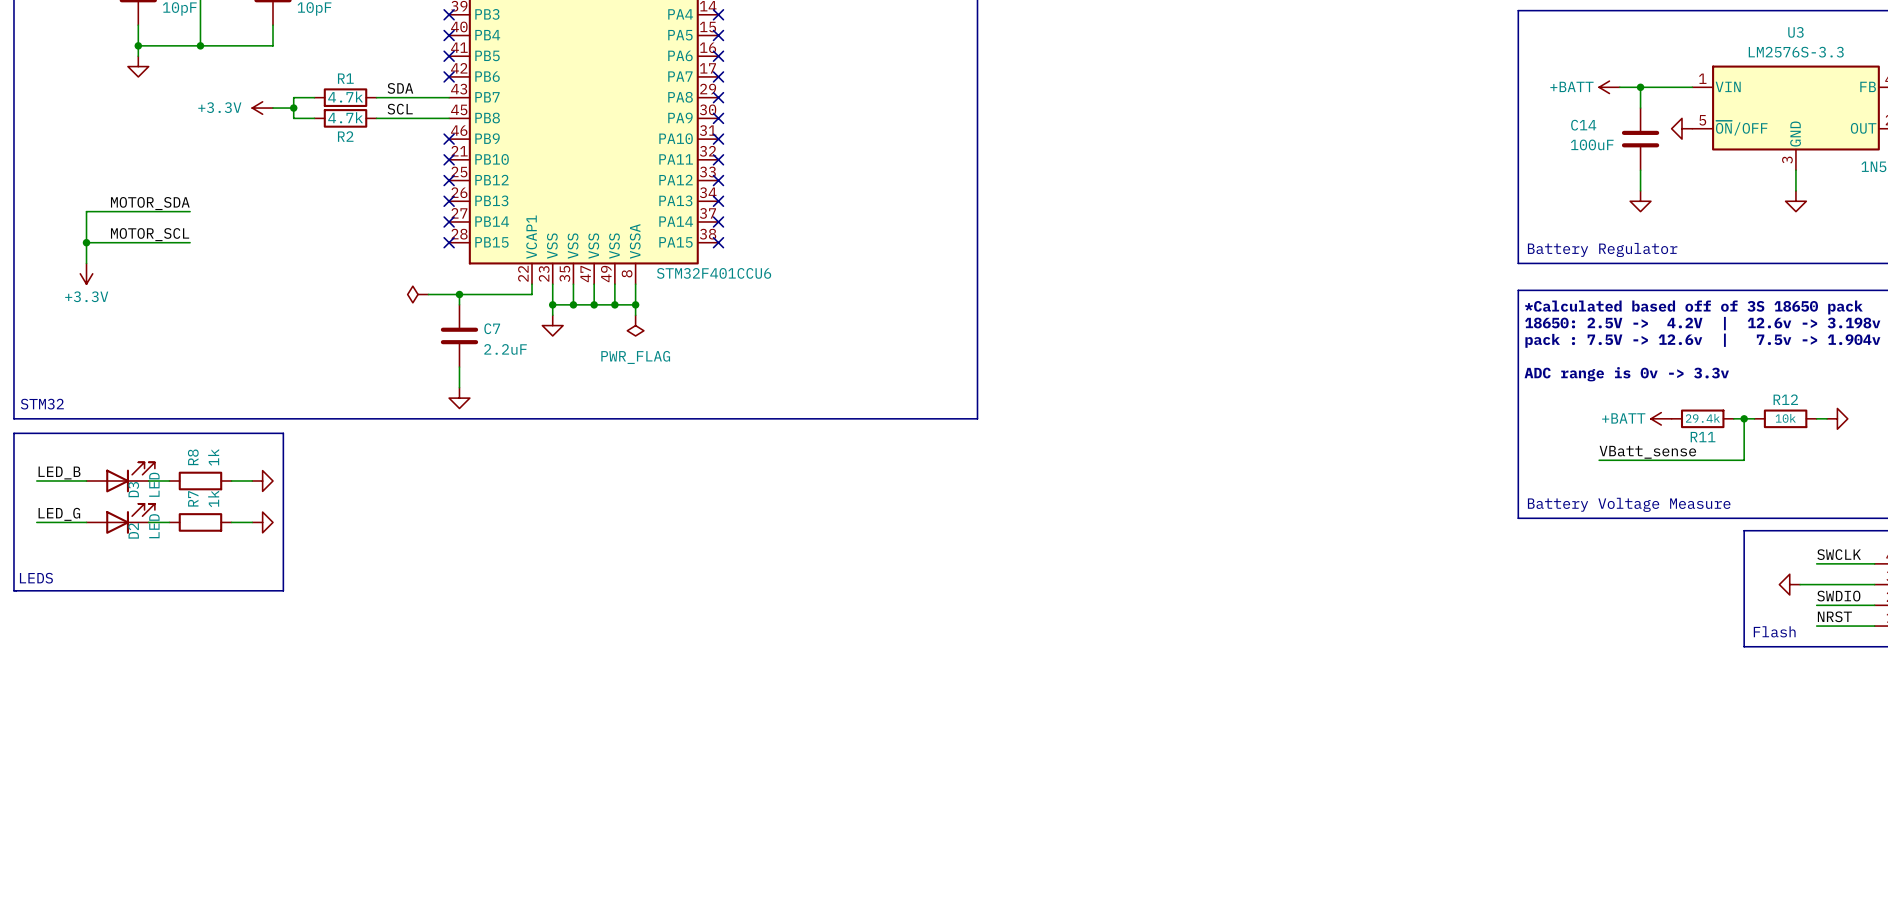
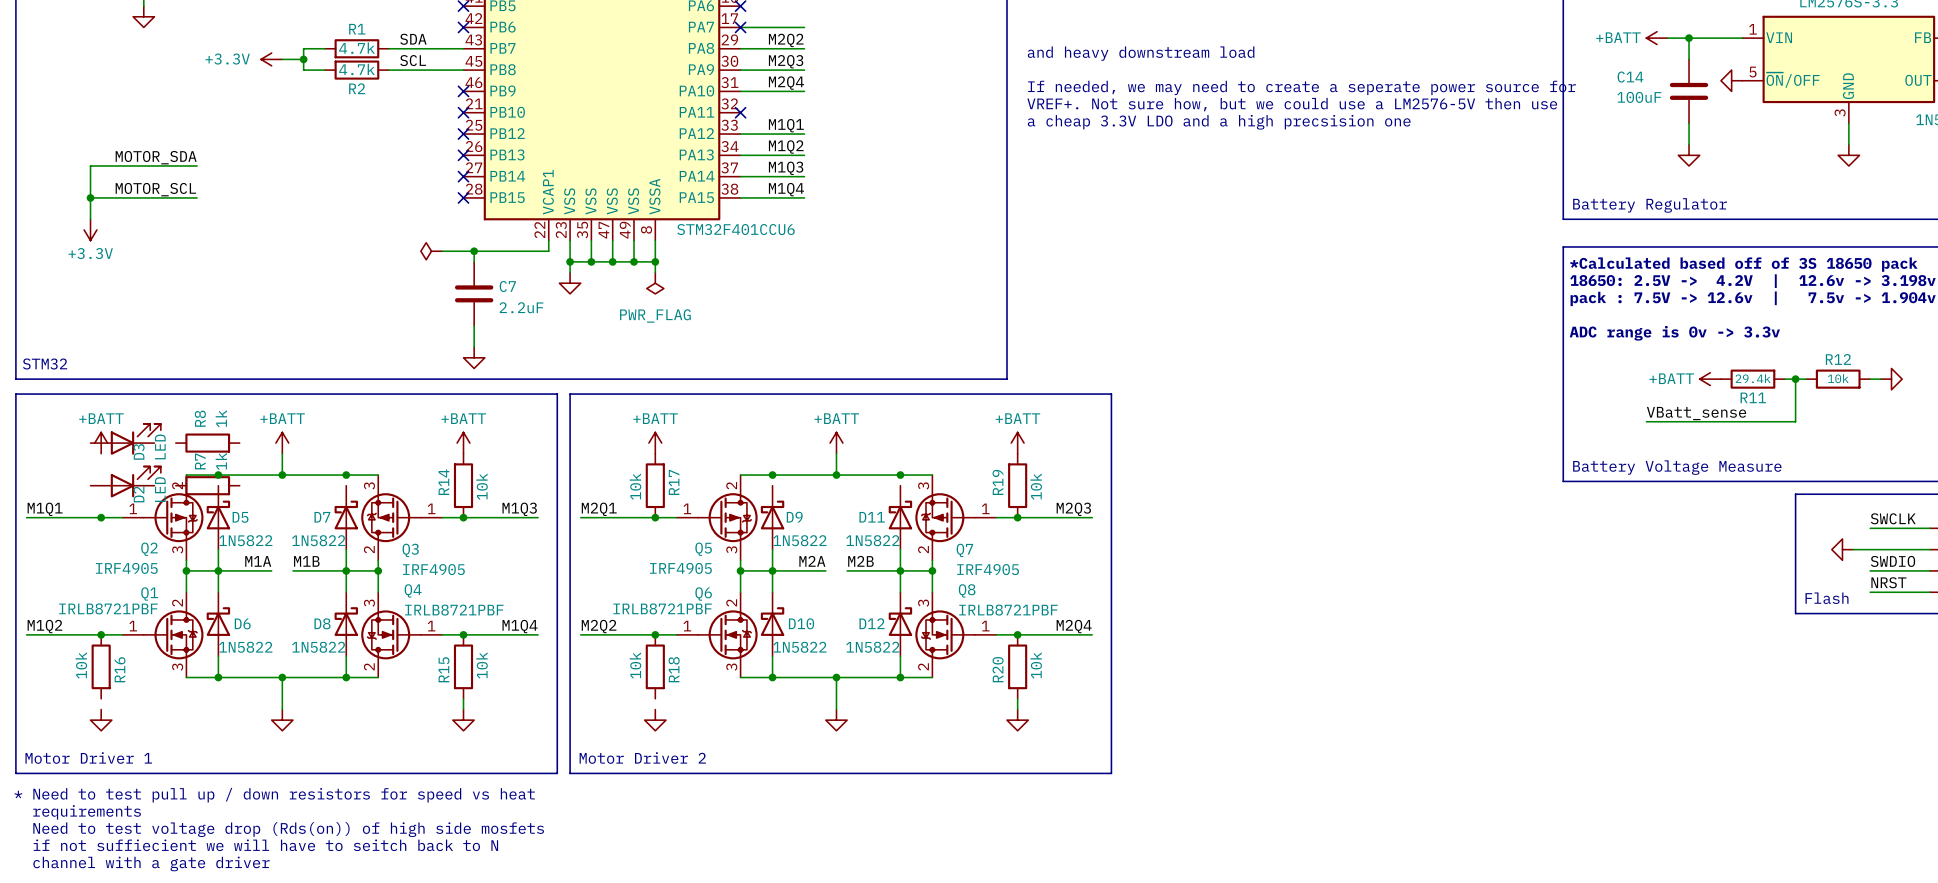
wire: none -> (740, 27) (804, 27)
label: none -> M2Q2 (786, 40)
wire: none -> (740, 48) (804, 48)
no-connect mark: (718, 97) -> none
text: none -> and heavy downstream load (1141, 53)
label: none -> M2Q3 (786, 61)
wire: none -> (740, 70) (804, 70)
no-connect mark: (718, 118) -> none
label: none -> M2Q4 (786, 83)
text: none -> If needed, we may need to create a seperate power source for (1301, 87)
wire: none -> (740, 91) (804, 91)
no-connect mark: (718, 139) -> none
text: none -> VREF+. Not sure how, but we could use a LM2576-5V then use (1292, 104)
text: none -> a cheap 3.3V LDO and a high precsision one (1219, 122)
label: none -> M1Q1 (786, 125)
wire: none -> (740, 134) (804, 134)
no-connect mark: (718, 180) -> none
label: none -> M1Q2 (786, 146)
wire: none -> (740, 155) (804, 155)
no-connect mark: (718, 201) -> none
label: none -> M1Q3 (786, 168)
wire: none -> (740, 176) (804, 176)
no-connect mark: (718, 221) -> none
label: none -> M1Q4 (786, 189)
wire: none -> (740, 197) (804, 197)
no-connect mark: (718, 242) -> none
line: (283, 433) (283, 590) (13, 590) -> (292, 394) (557, 394) (557, 773) (15, 773) (15, 556)
line: none -> (570, 394) (1111, 394) (1111, 773) (570, 773) (570, 394)
label: LED_B (59, 473) -> none
wire: (36, 480) (86, 480) -> none
power symbol: none -> +BATT (101, 443)
wire: (148, 480) (169, 480) -> none
wire: (231, 480) (252, 480) -> none
power symbol: (262, 480) -> none
power symbol: none -> +BATT (282, 443)
power symbol: none -> +BATT (463, 443)
power symbol: none -> +BATT (655, 443)
power symbol: none -> +BATT (836, 443)
power symbol: none -> +BATT (1017, 443)
wire: none -> (282, 453) (282, 475)
wire: none -> (836, 453) (836, 475)
wire: none -> (186, 475) (378, 475)
junction: none -> (218, 475)
junction: none -> (282, 475)
junction: none -> (346, 475)
wire: none -> (740, 475) (932, 475)
junction: none -> (772, 475)
junction: none -> (836, 475)
junction: none -> (900, 475)
label: LED_G (59, 514) -> none
wire: (36, 522) (86, 522) -> none
wire: (148, 522) (169, 522) -> none
wire: (231, 522) (252, 522) -> none
power symbol: (262, 522) -> none
R14: none -> 10k (463, 485)
R17: none -> 10k (655, 485)
R19: none -> 10k (1017, 485)
label: none -> M1Q1 (45, 509)
label: none -> M1Q3 (519, 509)
label: none -> M2Q1 (599, 509)
label: none -> M2Q3 (1073, 509)
wire: none -> (26, 517) (122, 517)
junction: none -> (101, 517)
Q2: none -> IRF4905 (162, 517)
D5: none -> 1N5822 (218, 517)
D7: none -> 1N5822 (346, 517)
Q3: none -> IRF4905 (401, 517)
wire: none -> (442, 517) (538, 517)
junction: none -> (463, 517)
wire: none -> (580, 517) (676, 517)
junction: none -> (655, 517)
Q5: none -> IRF4905 (717, 517)
D9: none -> 1N5822 (772, 517)
D11: none -> 1N5822 (900, 517)
Q7: none -> IRF4905 (955, 517)
wire: none -> (996, 517) (1092, 517)
junction: none -> (1017, 517)
text: LEDS (36, 578) -> none
wire: none -> (218, 549) (218, 592)
wire: none -> (346, 549) (346, 592)
wire: none -> (772, 549) (772, 592)
wire: none -> (900, 549) (900, 592)
wire: none -> (186, 560) (186, 592)
wire: none -> (378, 560) (378, 592)
wire: none -> (740, 560) (740, 592)
wire: none -> (932, 560) (932, 592)
label: none -> M2A (812, 561)
label: none -> M2B (860, 561)
label: none -> M1A (258, 561)
label: none -> M1B (306, 561)
wire: none -> (186, 570) (271, 570)
junction: none -> (186, 570)
junction: none -> (218, 570)
wire: none -> (292, 570) (378, 570)
junction: none -> (346, 570)
junction: none -> (378, 570)
wire: none -> (740, 570) (825, 570)
junction: none -> (740, 570)
junction: none -> (772, 570)
wire: none -> (847, 570) (932, 570)
junction: none -> (900, 570)
junction: none -> (932, 570)
D6: none -> 1N5822 (218, 624)
D8: none -> 1N5822 (346, 624)
D10: none -> 1N5822 (772, 624)
D12: none -> 1N5822 (900, 624)
label: none -> M1Q2 (44, 626)
label: none -> M1Q4 (520, 626)
label: none -> M2Q2 (599, 626)
label: none -> M2Q4 (1074, 626)
wire: none -> (26, 634) (122, 634)
junction: none -> (101, 634)
Q1: none -> IRLB8721PBF (162, 634)
Q4: none -> IRLB8721PBF (401, 634)
wire: none -> (442, 634) (538, 634)
junction: none -> (463, 634)
wire: none -> (580, 634) (676, 634)
junction: none -> (655, 634)
Q6: none -> IRLB8721PBF (717, 634)
Q8: none -> IRLB8721PBF (955, 634)
wire: none -> (996, 634) (1092, 634)
junction: none -> (1017, 634)
wire: none -> (218, 656) (218, 677)
wire: none -> (346, 656) (346, 677)
wire: none -> (772, 656) (772, 677)
wire: none -> (900, 656) (900, 677)
R16: none -> 10k (101, 666)
R15: none -> 10k (463, 666)
R18: none -> 10k (655, 666)
R20: none -> 10k (1017, 666)
wire: none -> (186, 677) (378, 677)
junction: none -> (218, 677)
wire: none -> (282, 677) (282, 709)
junction: none -> (282, 677)
junction: none -> (346, 677)
wire: none -> (740, 677) (932, 677)
junction: none -> (772, 677)
wire: none -> (836, 677) (836, 709)
junction: none -> (836, 677)
junction: none -> (900, 677)
wire: none -> (463, 698) (463, 709)
wire: none -> (1017, 698) (1017, 709)
power symbol: none -> (101, 720)
power symbol: none -> (282, 720)
power symbol: none -> (463, 720)
power symbol: none -> (655, 720)
power symbol: none -> (836, 720)
power symbol: none -> (1017, 720)
text: none -> Motor Driver 1 (88, 758)
text: none -> Motor Driver 2 (642, 758)
text: none -> * Need to test pull up / down resistors for speed vs heat (274, 795)
text: none -> requirements (87, 812)
text: none -> Need to test voltage drop (Rds(on)) of high side mosfets (288, 829)
text: none -> if not suffiecient we will have to seitch back to N (265, 845)
text: none -> channel with a gate driver (151, 863)

